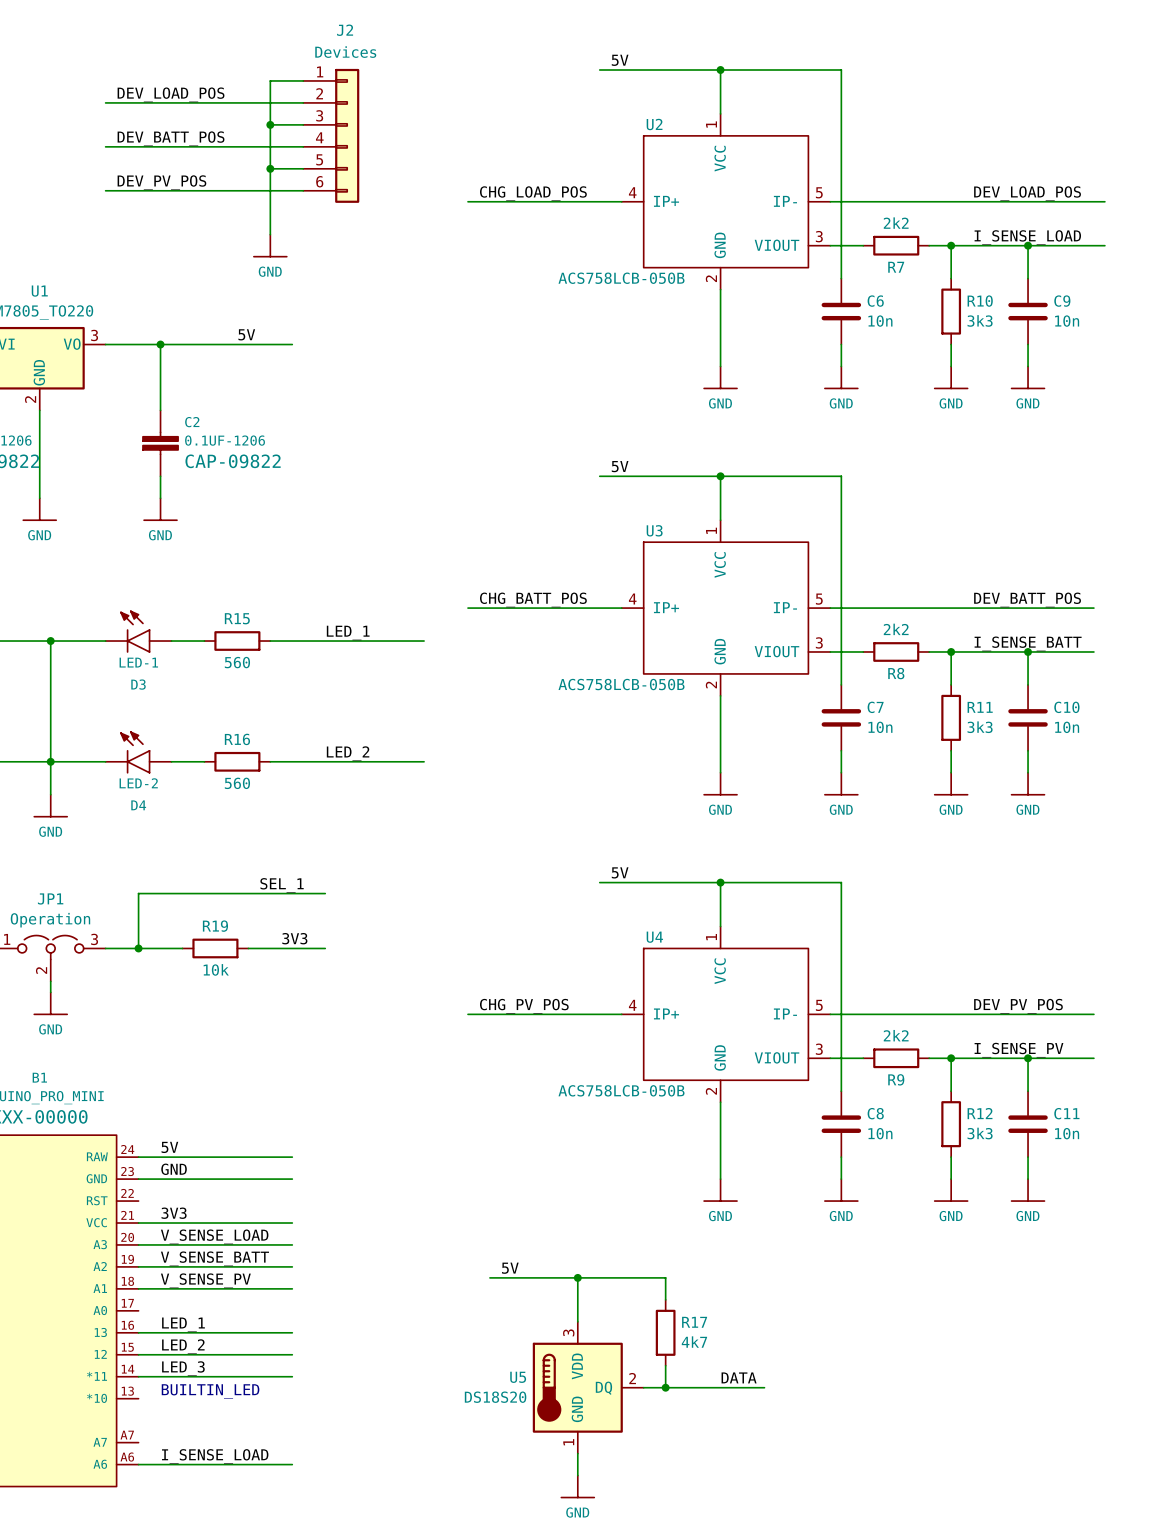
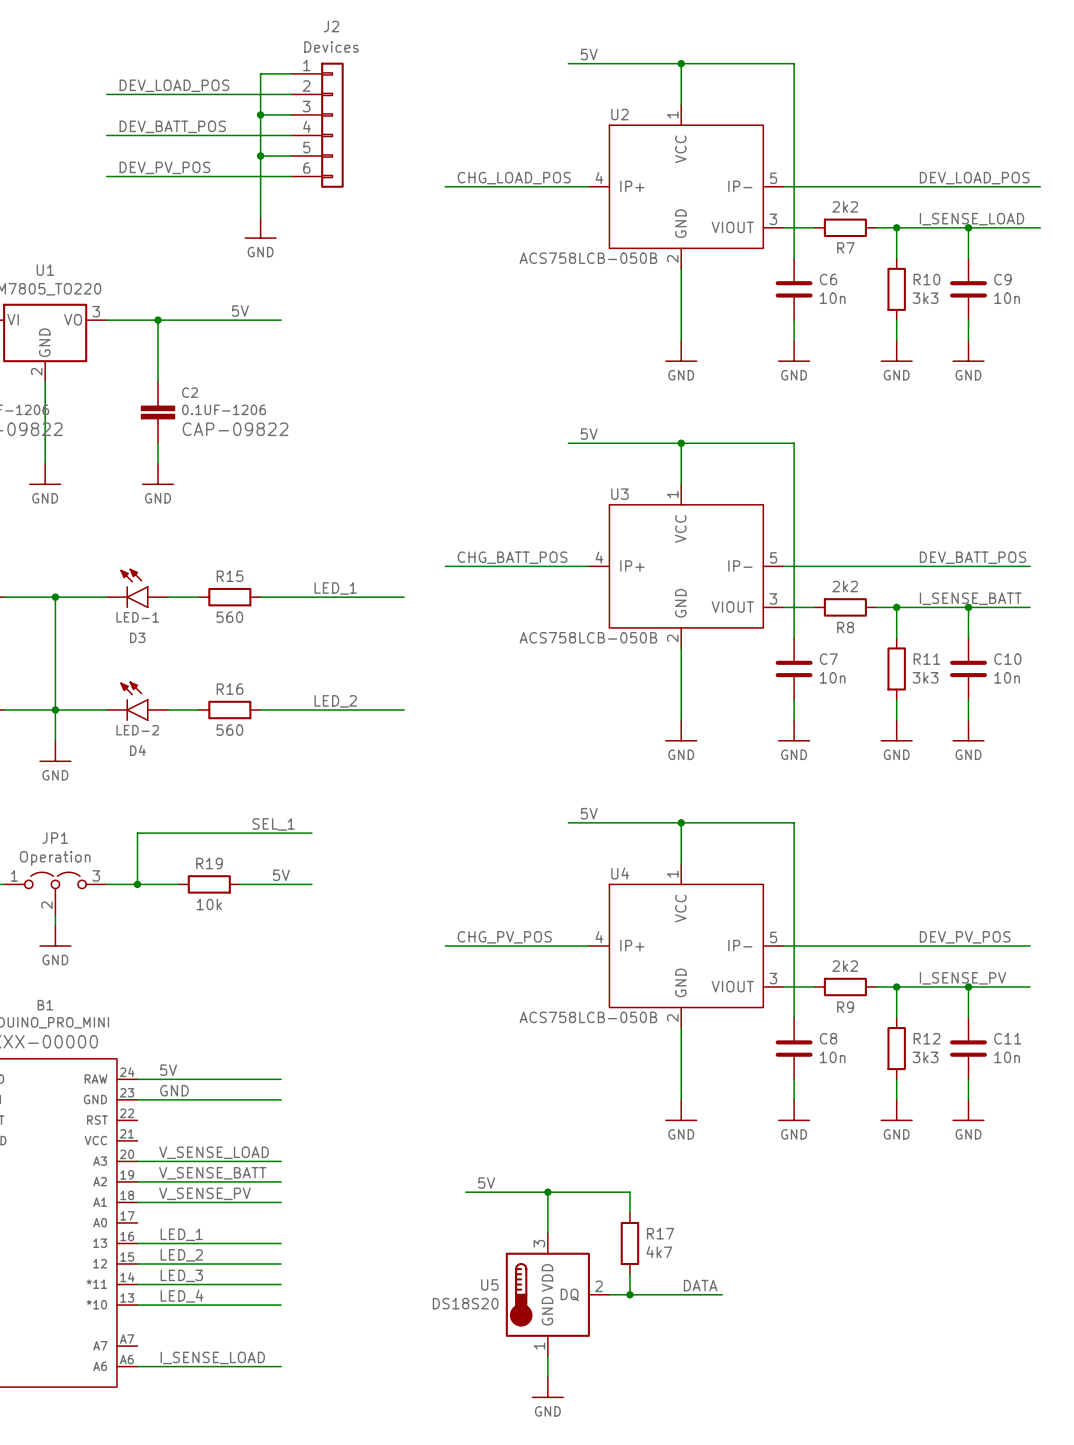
label: 3V3 (294, 938) -> 5V (281, 875)
label: 3V3 (174, 1213) -> none
wire: (138, 1223) (292, 1223) -> (137, 1305) (281, 1305)
label: none -> LED_4 (182, 1296)
text: BUILTIN_LED (210, 1391) -> none

